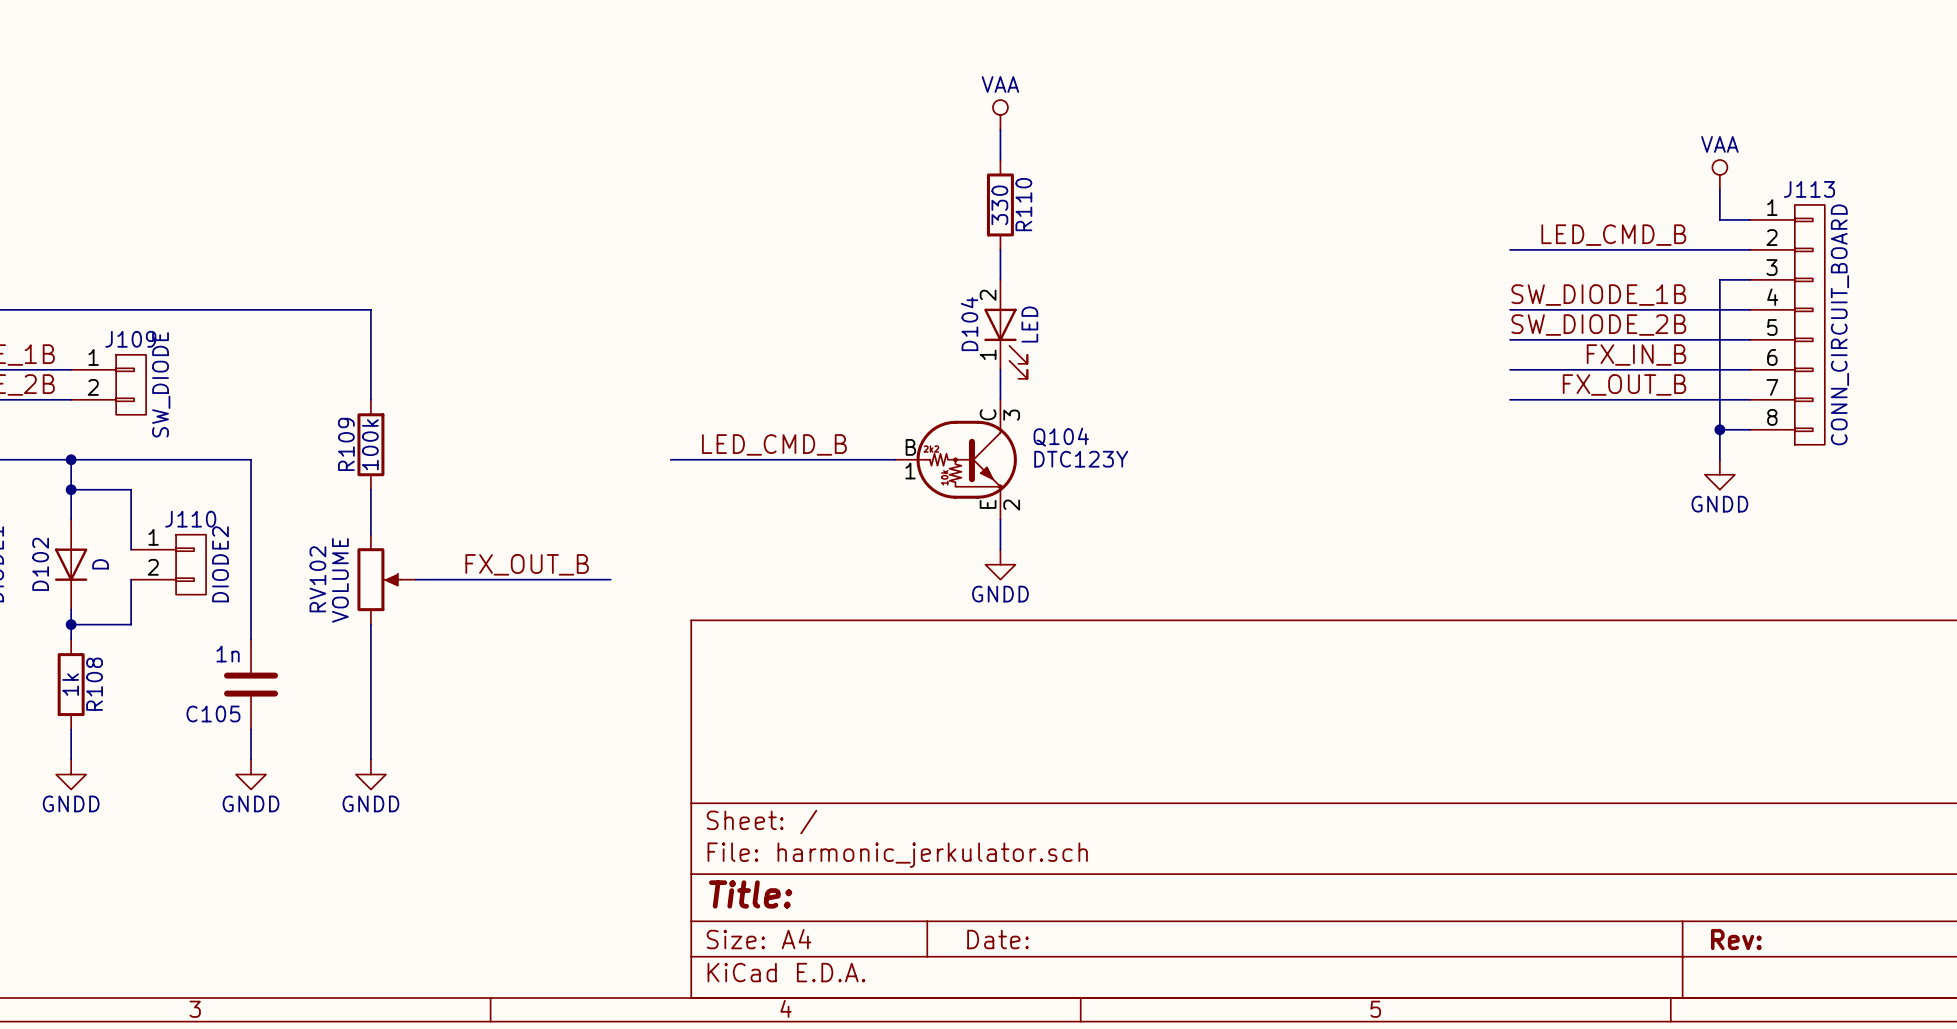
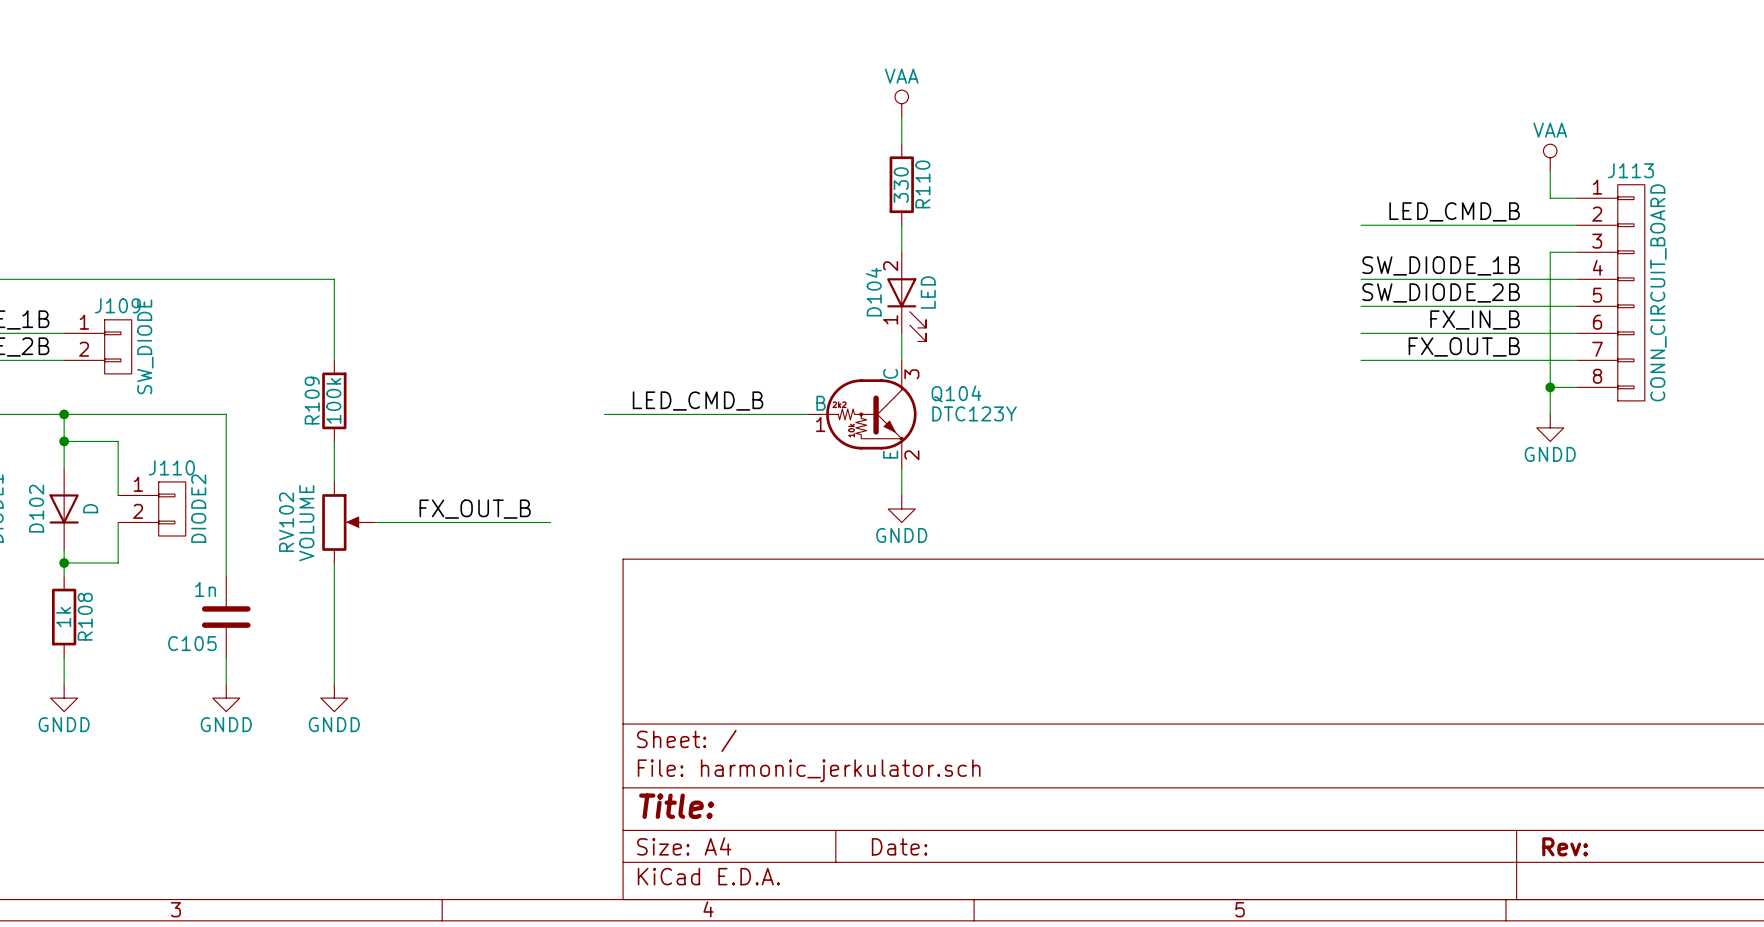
RV102 flip: as is (379, 579) -> up-down (341, 522)

